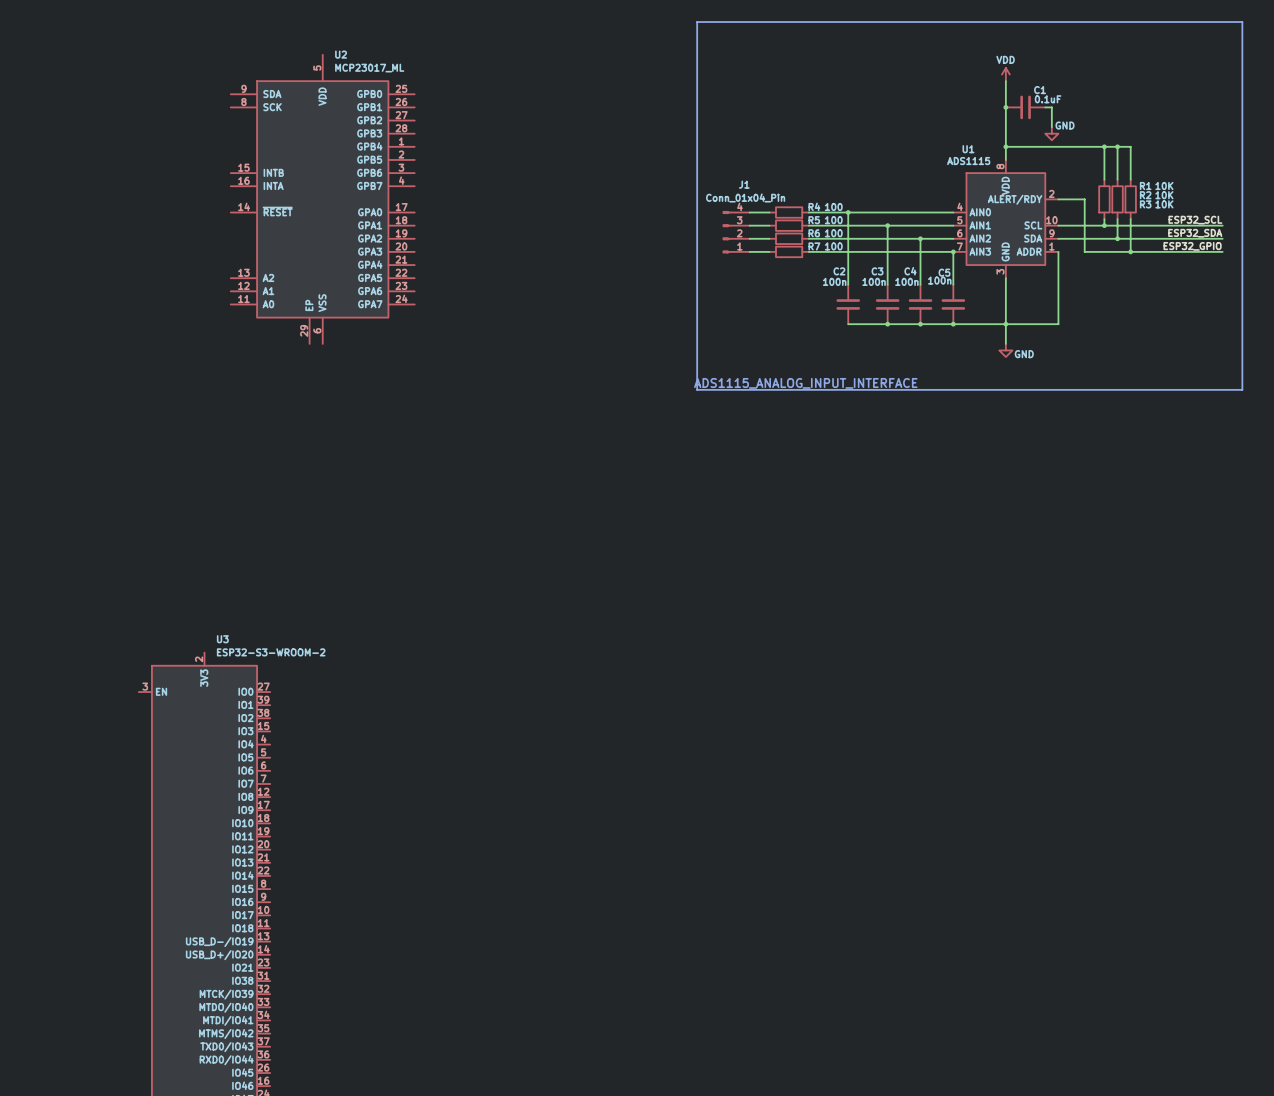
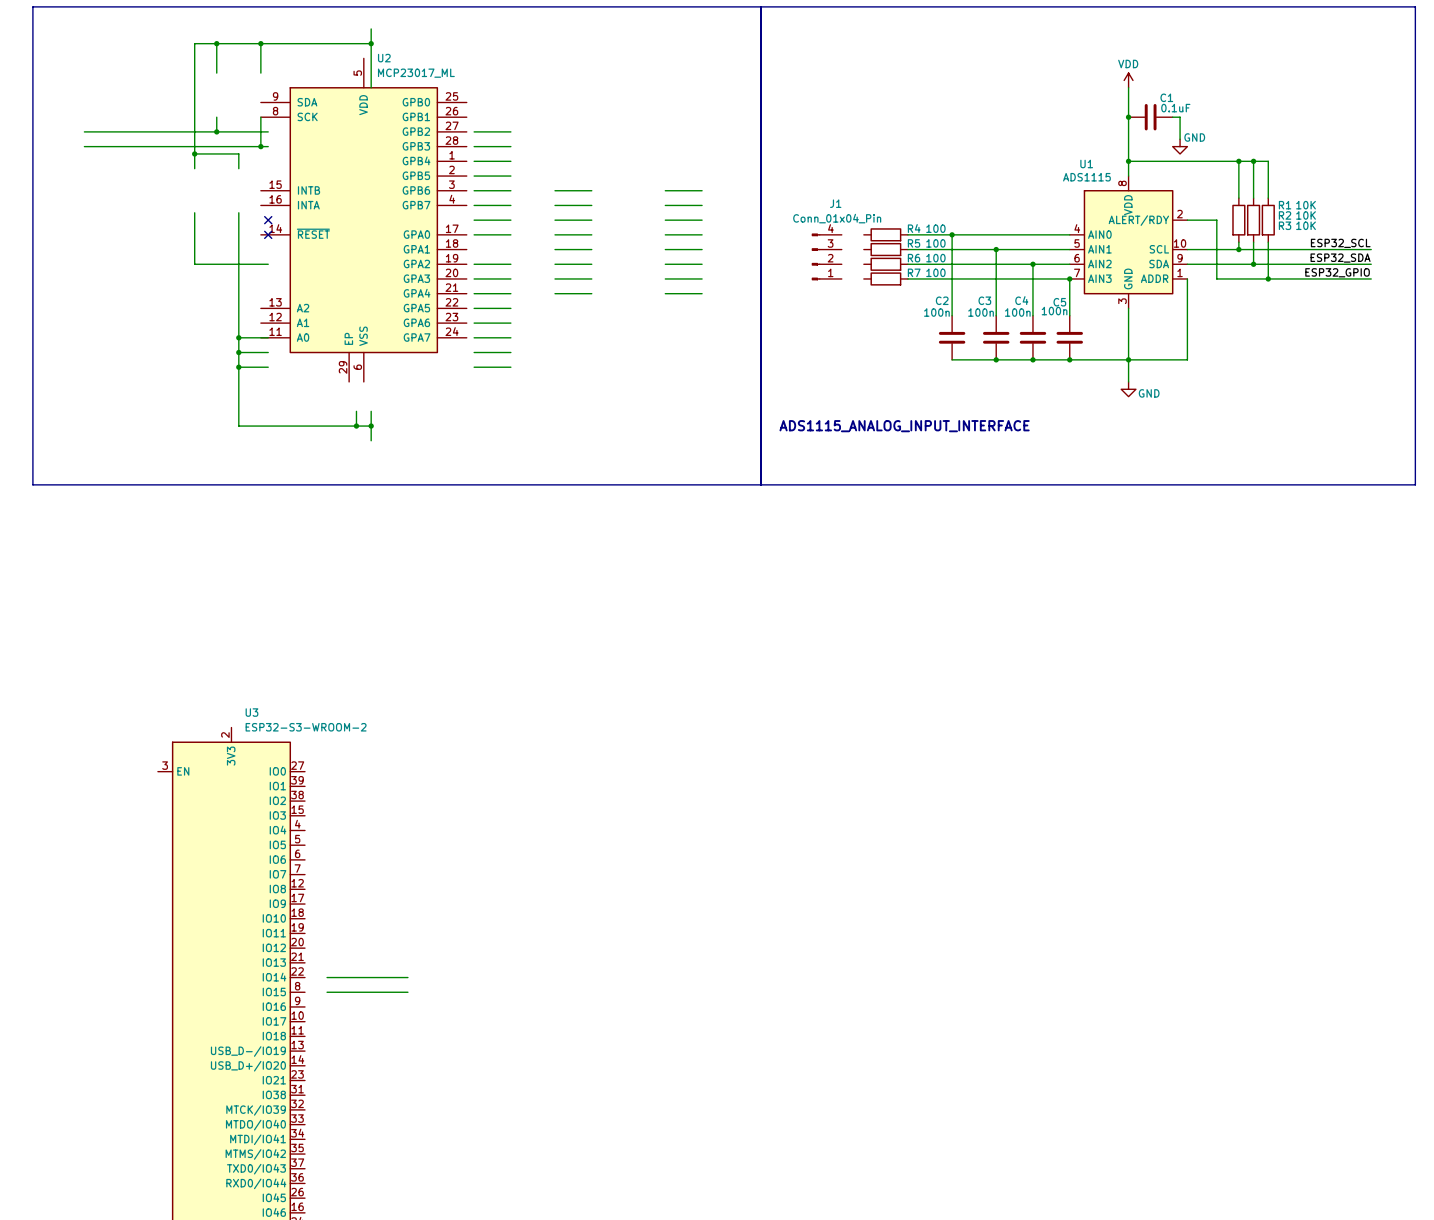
line: none -> (32, 6) (1415, 6) (1415, 484) (32, 484) (32, 6)
line: none -> (760, 6) (760, 484)
line: (697, 22) (1242, 22) (1242, 389) (697, 389) (697, 22) -> none
wire: none -> (371, 28) (371, 87)
wire: none -> (216, 43) (216, 73)
junction: none -> (216, 43)
wire: none -> (260, 43) (260, 73)
junction: none -> (260, 43)
wire: none -> (371, 43) (194, 43) (194, 168)
junction: none -> (371, 43)
wire: none -> (216, 117) (216, 131)
wire: none -> (260, 117) (260, 146)
wire: none -> (84, 131) (268, 131)
junction: none -> (216, 131)
wire: none -> (474, 131) (510, 131)
wire: none -> (84, 146) (268, 146)
junction: none -> (260, 146)
wire: none -> (474, 146) (510, 146)
wire: none -> (194, 153) (238, 153) (238, 168)
junction: none -> (194, 153)
wire: none -> (474, 161) (510, 161)
wire: none -> (474, 176) (510, 176)
wire: none -> (474, 190) (510, 190)
wire: none -> (555, 190) (591, 190)
wire: none -> (665, 190) (702, 190)
wire: none -> (474, 205) (510, 205)
wire: none -> (555, 205) (591, 205)
wire: none -> (665, 205) (702, 205)
wire: none -> (194, 212) (194, 264) (268, 264)
wire: none -> (238, 212) (238, 426) (371, 426)
no-connect mark: none -> (268, 220)
wire: none -> (474, 220) (510, 220)
wire: none -> (555, 220) (591, 220)
wire: none -> (665, 220) (702, 220)
no-connect mark: none -> (268, 234)
wire: none -> (474, 234) (510, 234)
wire: none -> (555, 234) (591, 234)
wire: none -> (665, 234) (702, 234)
wire: (749, 212) (769, 212) -> none
wire: none -> (555, 249) (591, 249)
wire: none -> (665, 249) (702, 249)
wire: (749, 225) (769, 225) -> none
wire: none -> (474, 264) (510, 264)
wire: none -> (555, 264) (591, 264)
wire: none -> (665, 264) (702, 264)
wire: (749, 238) (769, 238) -> none
wire: none -> (474, 278) (510, 278)
wire: none -> (555, 278) (591, 278)
wire: none -> (665, 278) (702, 278)
wire: (749, 251) (769, 251) -> none
wire: none -> (474, 293) (510, 293)
wire: none -> (555, 293) (591, 293)
wire: none -> (665, 293) (702, 293)
wire: none -> (474, 308) (510, 308)
wire: none -> (474, 323) (510, 323)
wire: none -> (238, 337) (268, 337)
junction: none -> (238, 337)
wire: none -> (474, 337) (510, 337)
wire: none -> (238, 352) (268, 352)
junction: none -> (238, 352)
wire: none -> (474, 352) (510, 352)
wire: none -> (238, 367) (268, 367)
junction: none -> (238, 367)
wire: none -> (474, 367) (510, 367)
wire: none -> (356, 411) (356, 426)
wire: none -> (371, 411) (371, 440)
junction: none -> (356, 426)
junction: none -> (371, 426)
wire: none -> (327, 977) (407, 977)
wire: none -> (327, 992) (407, 992)

